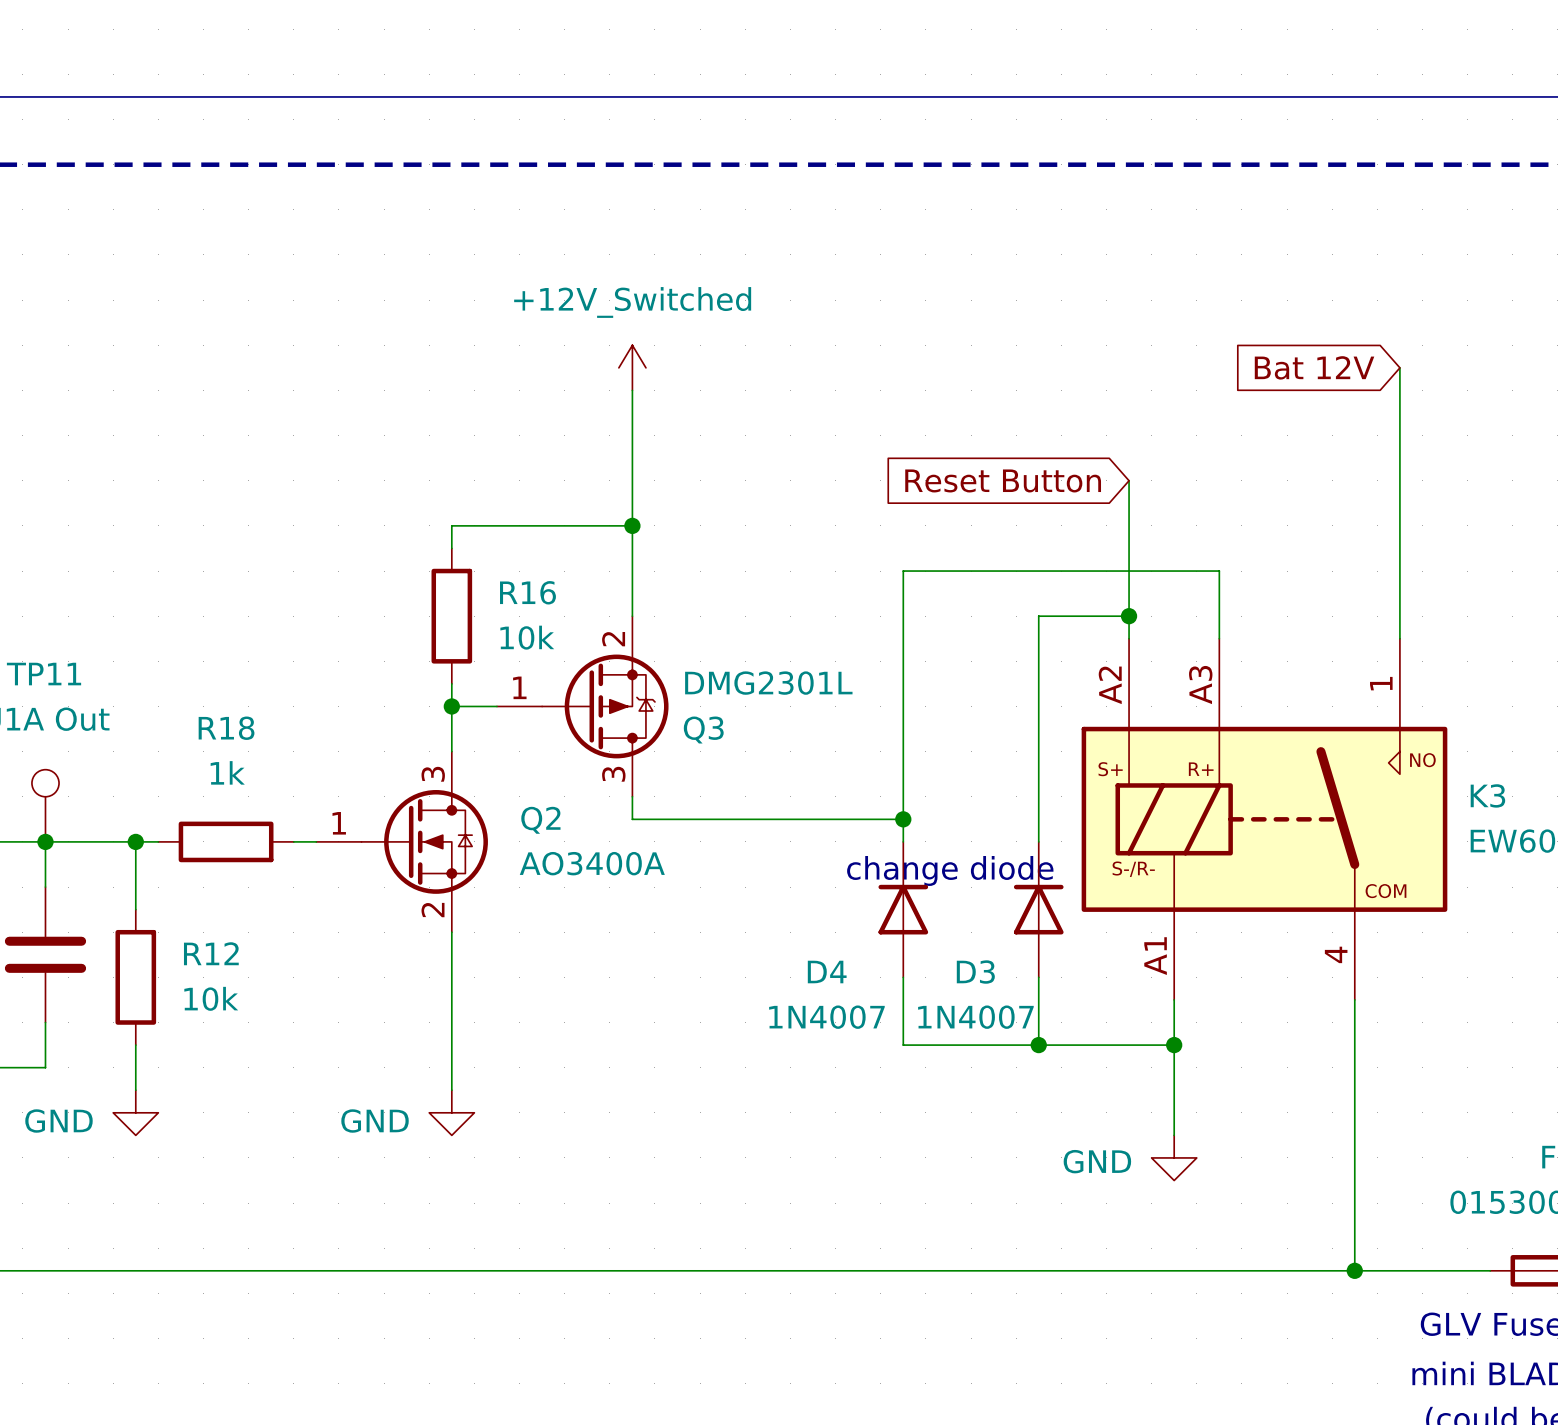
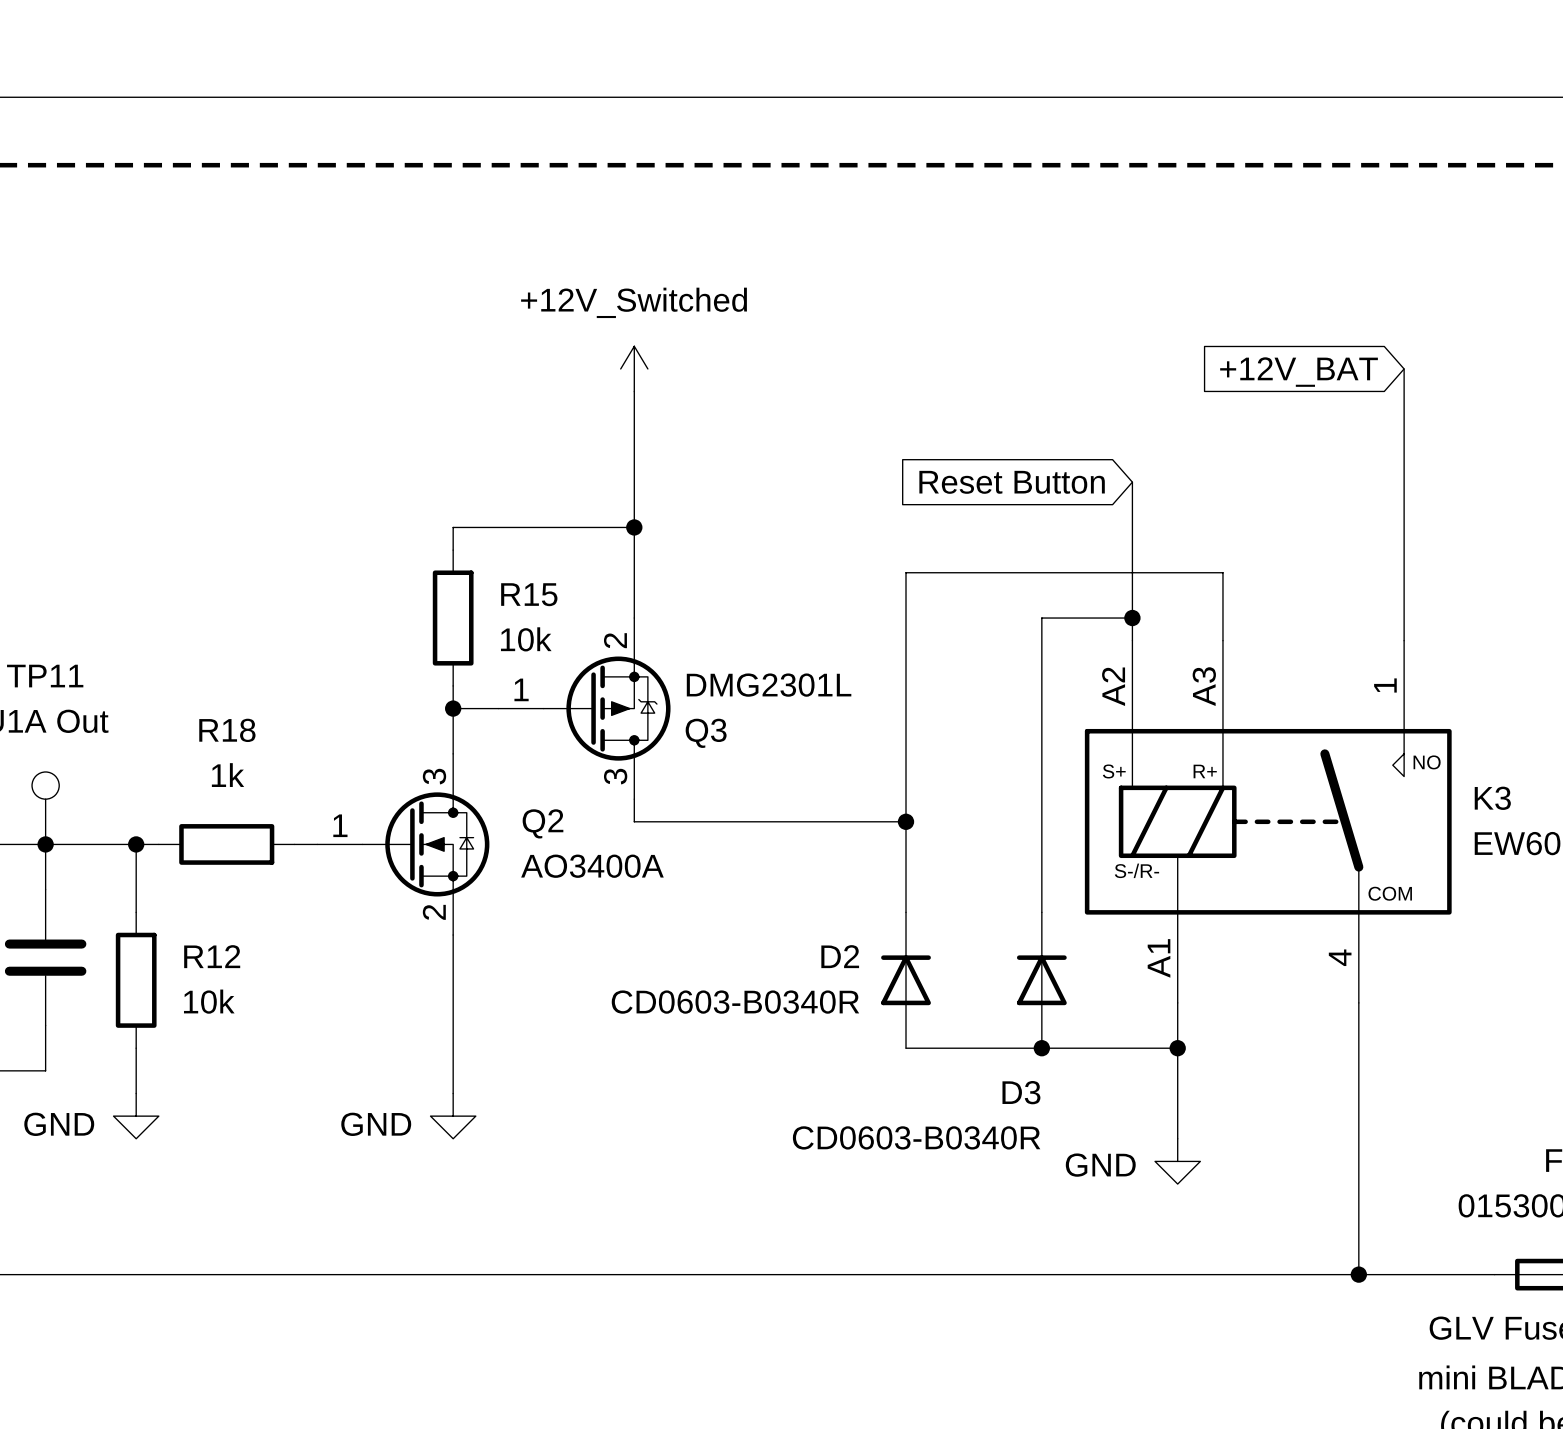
global label: Bat 12V (1314, 367) -> +12V_BAT (1299, 372)
R16 name: R16 (527, 592) -> R15 (529, 594)
text: change diode (950, 870) -> none
D4: 1N4007 (903, 909) -> none
D3 position: (1038, 909) -> (1041, 980)
D3 name position: D3 (975, 972) -> D3 (1021, 1092)
D2: none -> CD0603-B0340R (906, 980)
D3 value: 1N4007 (975, 1017) -> CD0603-B0340R (916, 1137)

